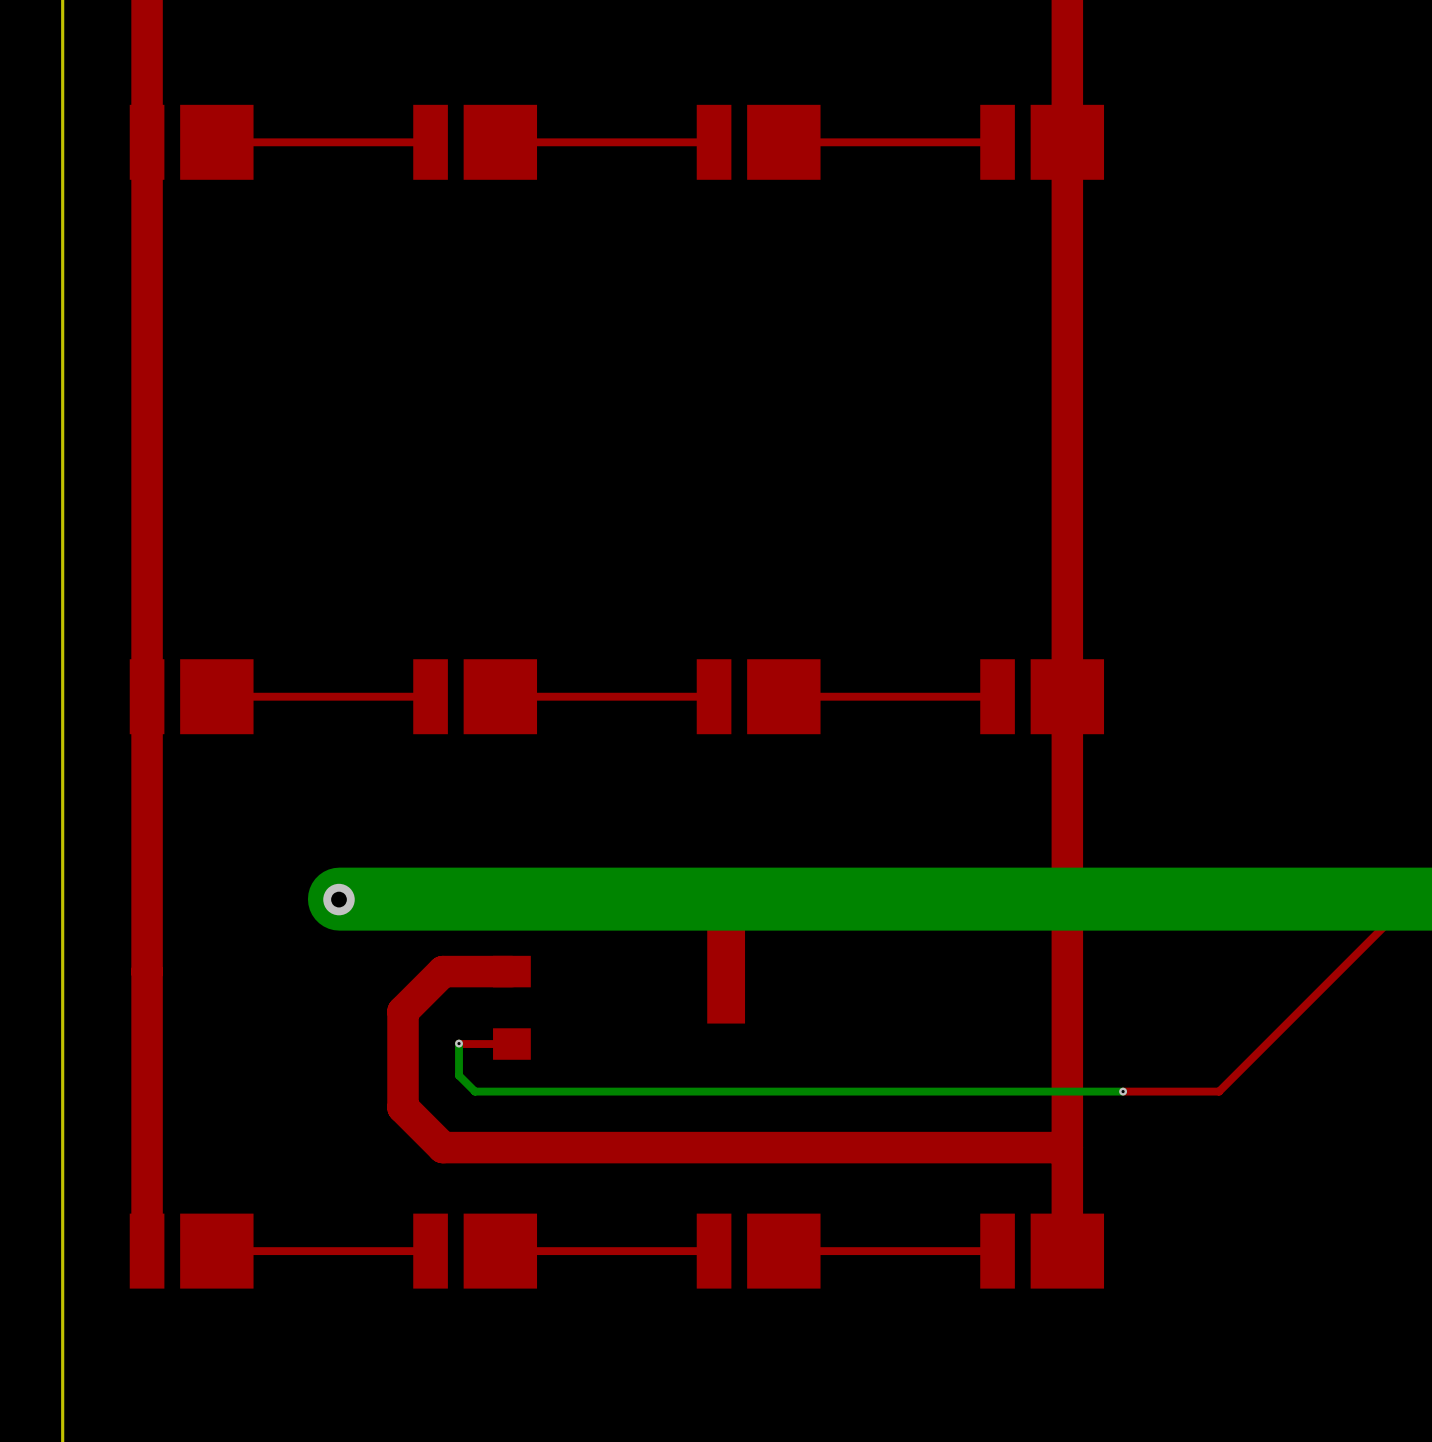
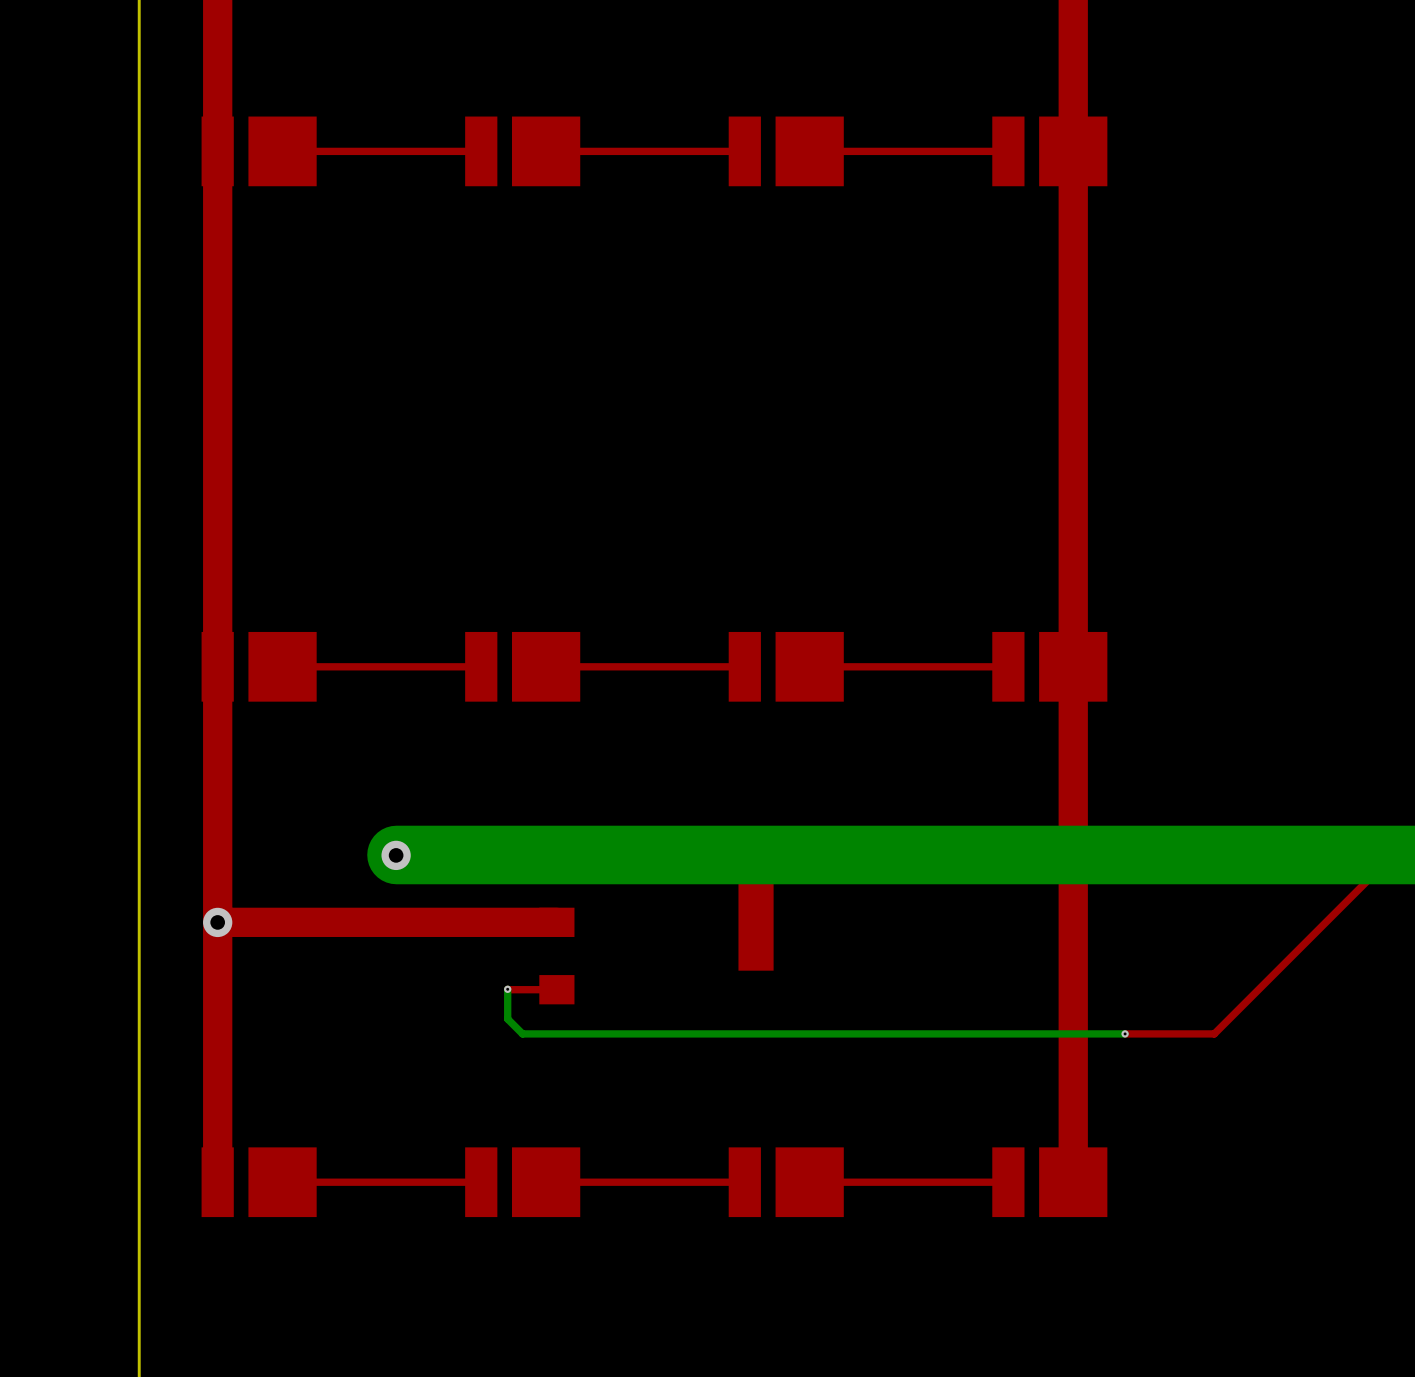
via: none -> (217, 922)
top track: (443, 971) (403, 1011) (403, 1107) (443, 1147) (1067, 1147) -> (492, 922) (217, 922)

